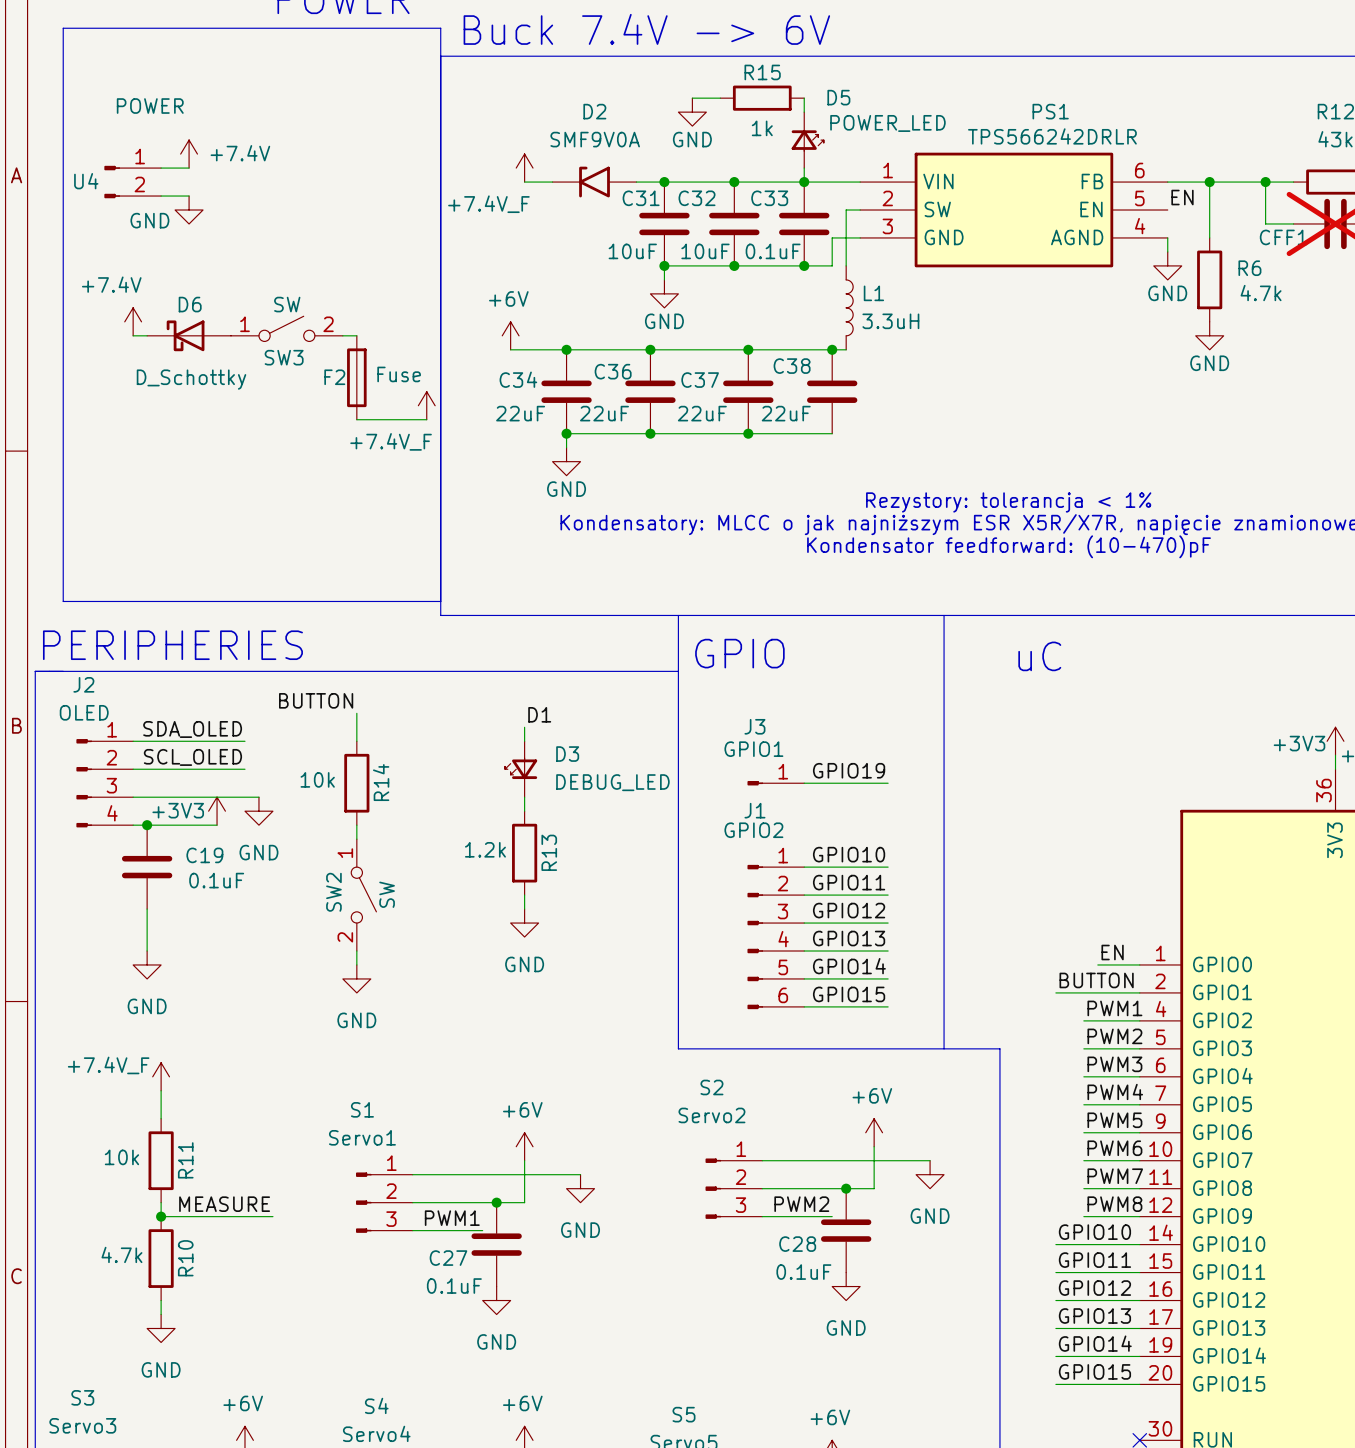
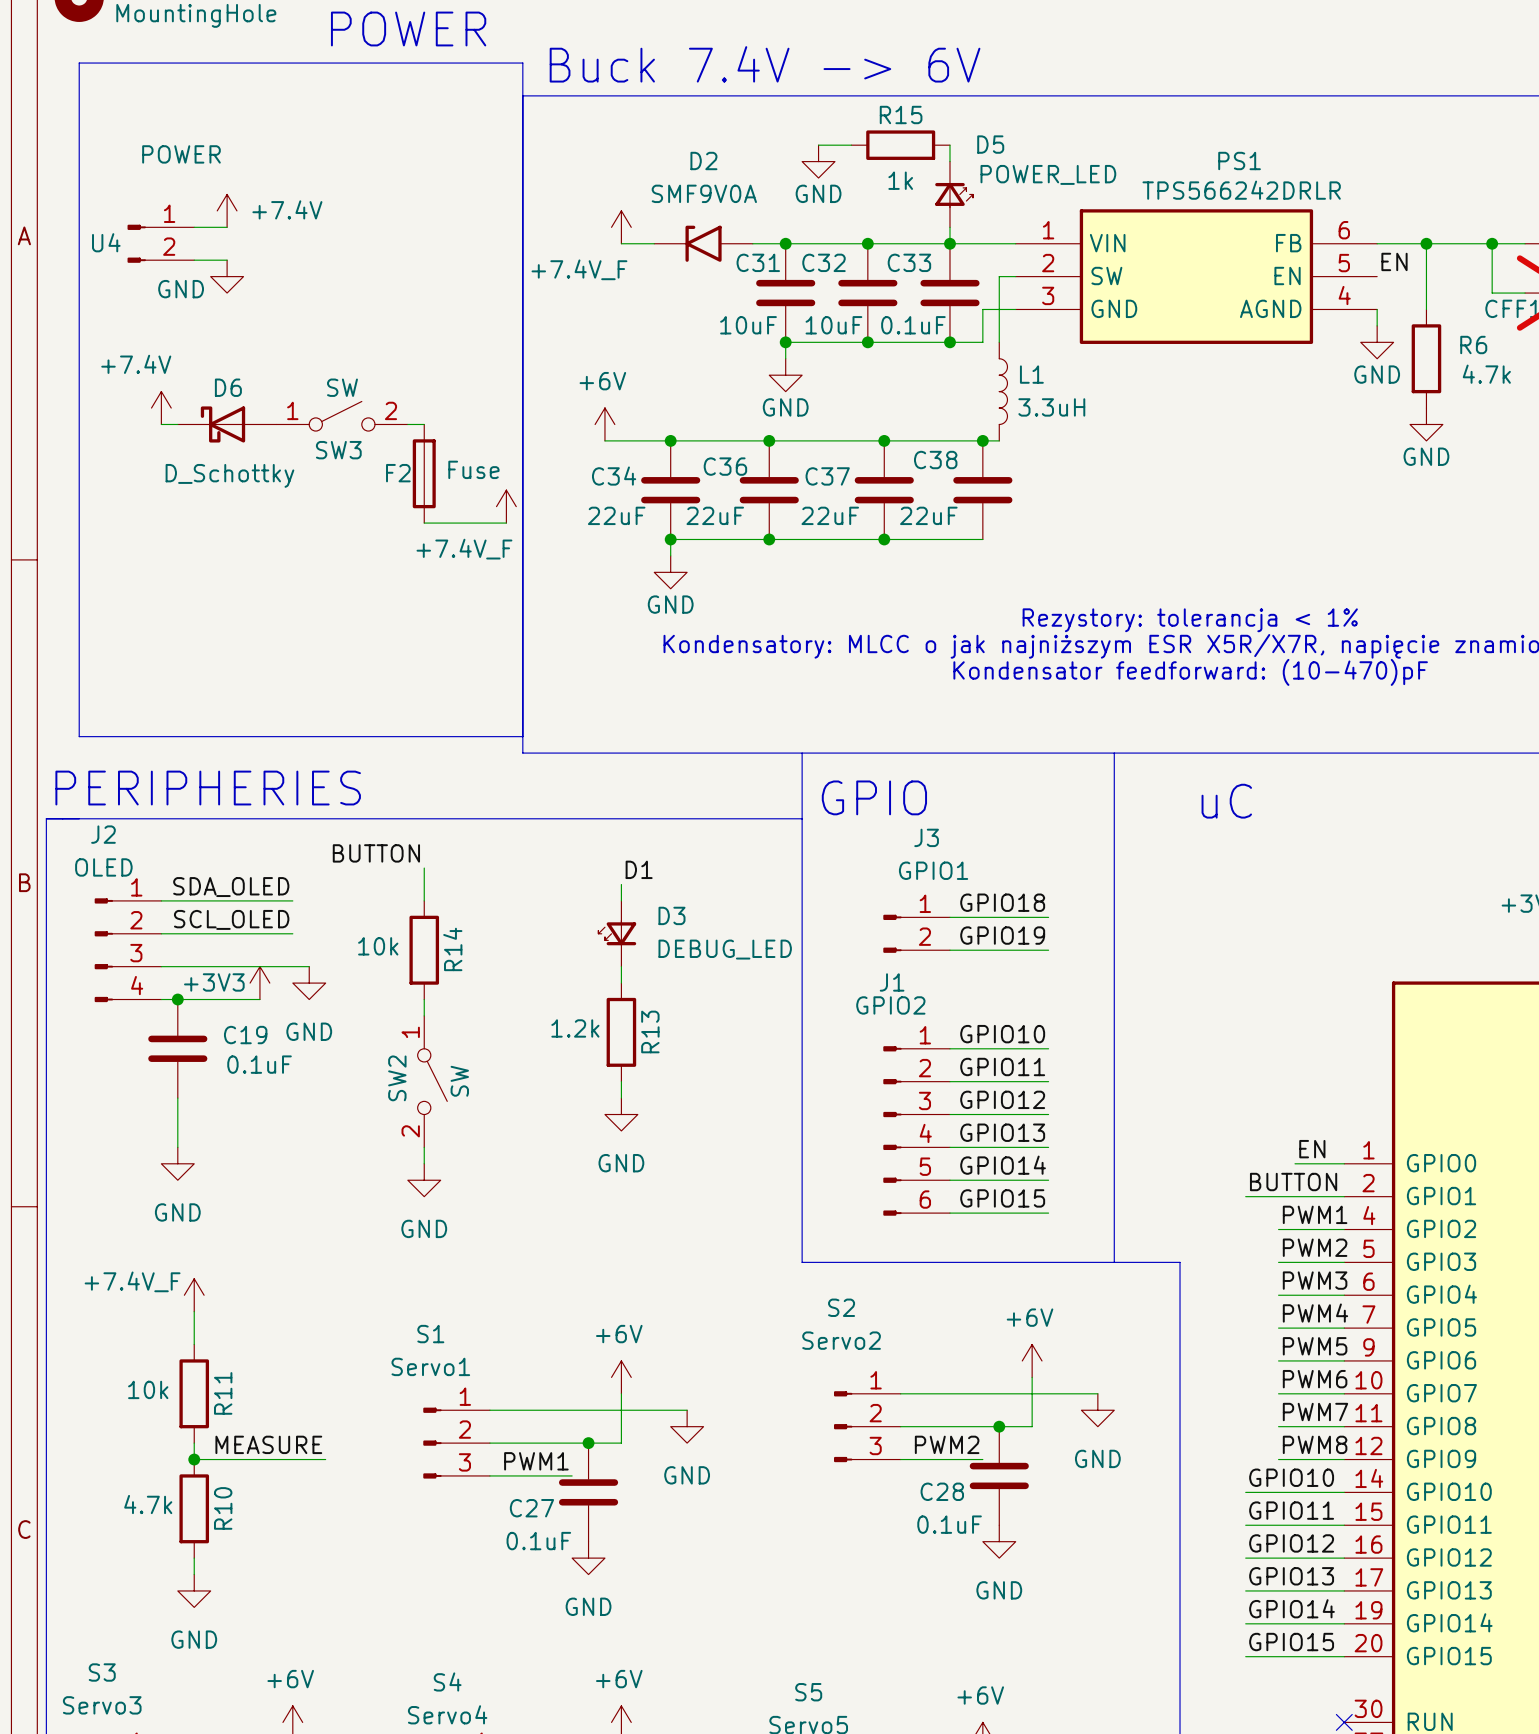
J3 name position: J3 (754, 726) -> J3 (926, 837)
label: none -> GPIO18 (1002, 902)
J3 value position: GPIO1 (753, 749) -> GPIO1 (933, 870)
wire: none -> (949, 917) (1048, 917)
J3 symbol: [747, 780, 805, 786] -> [883, 914, 950, 953]

